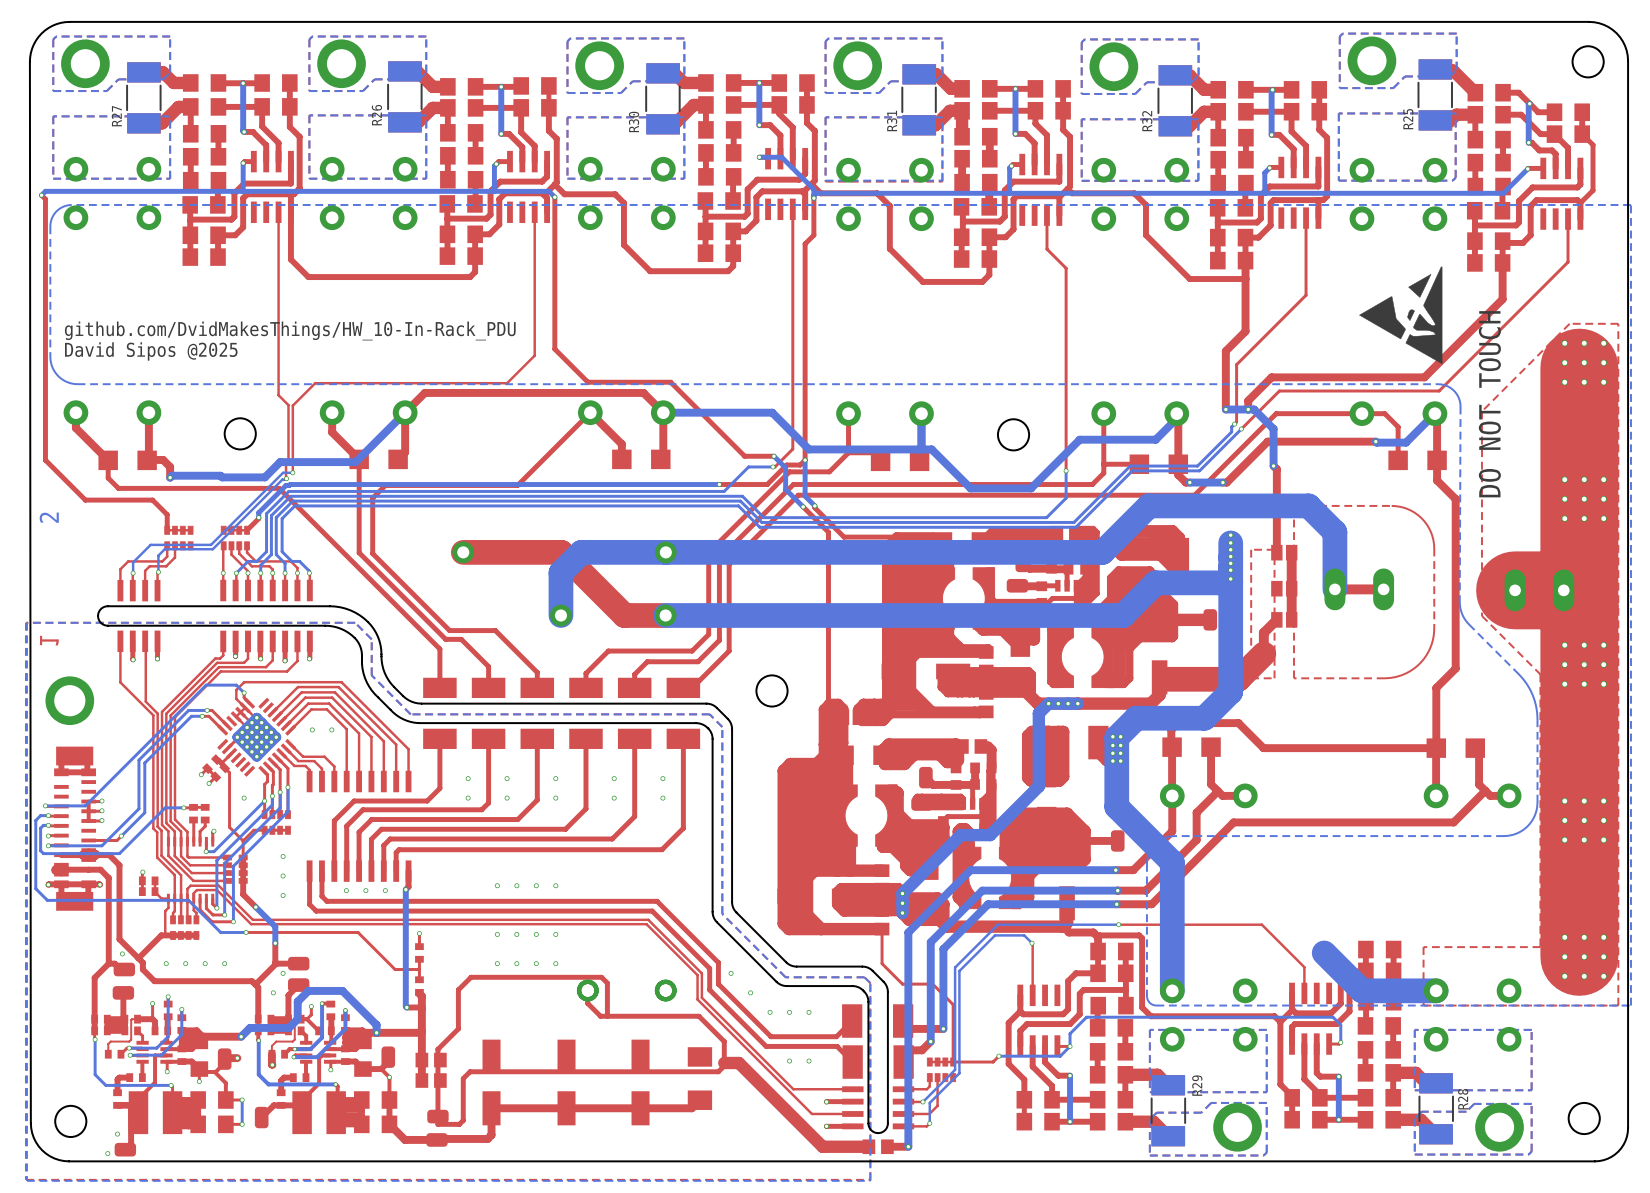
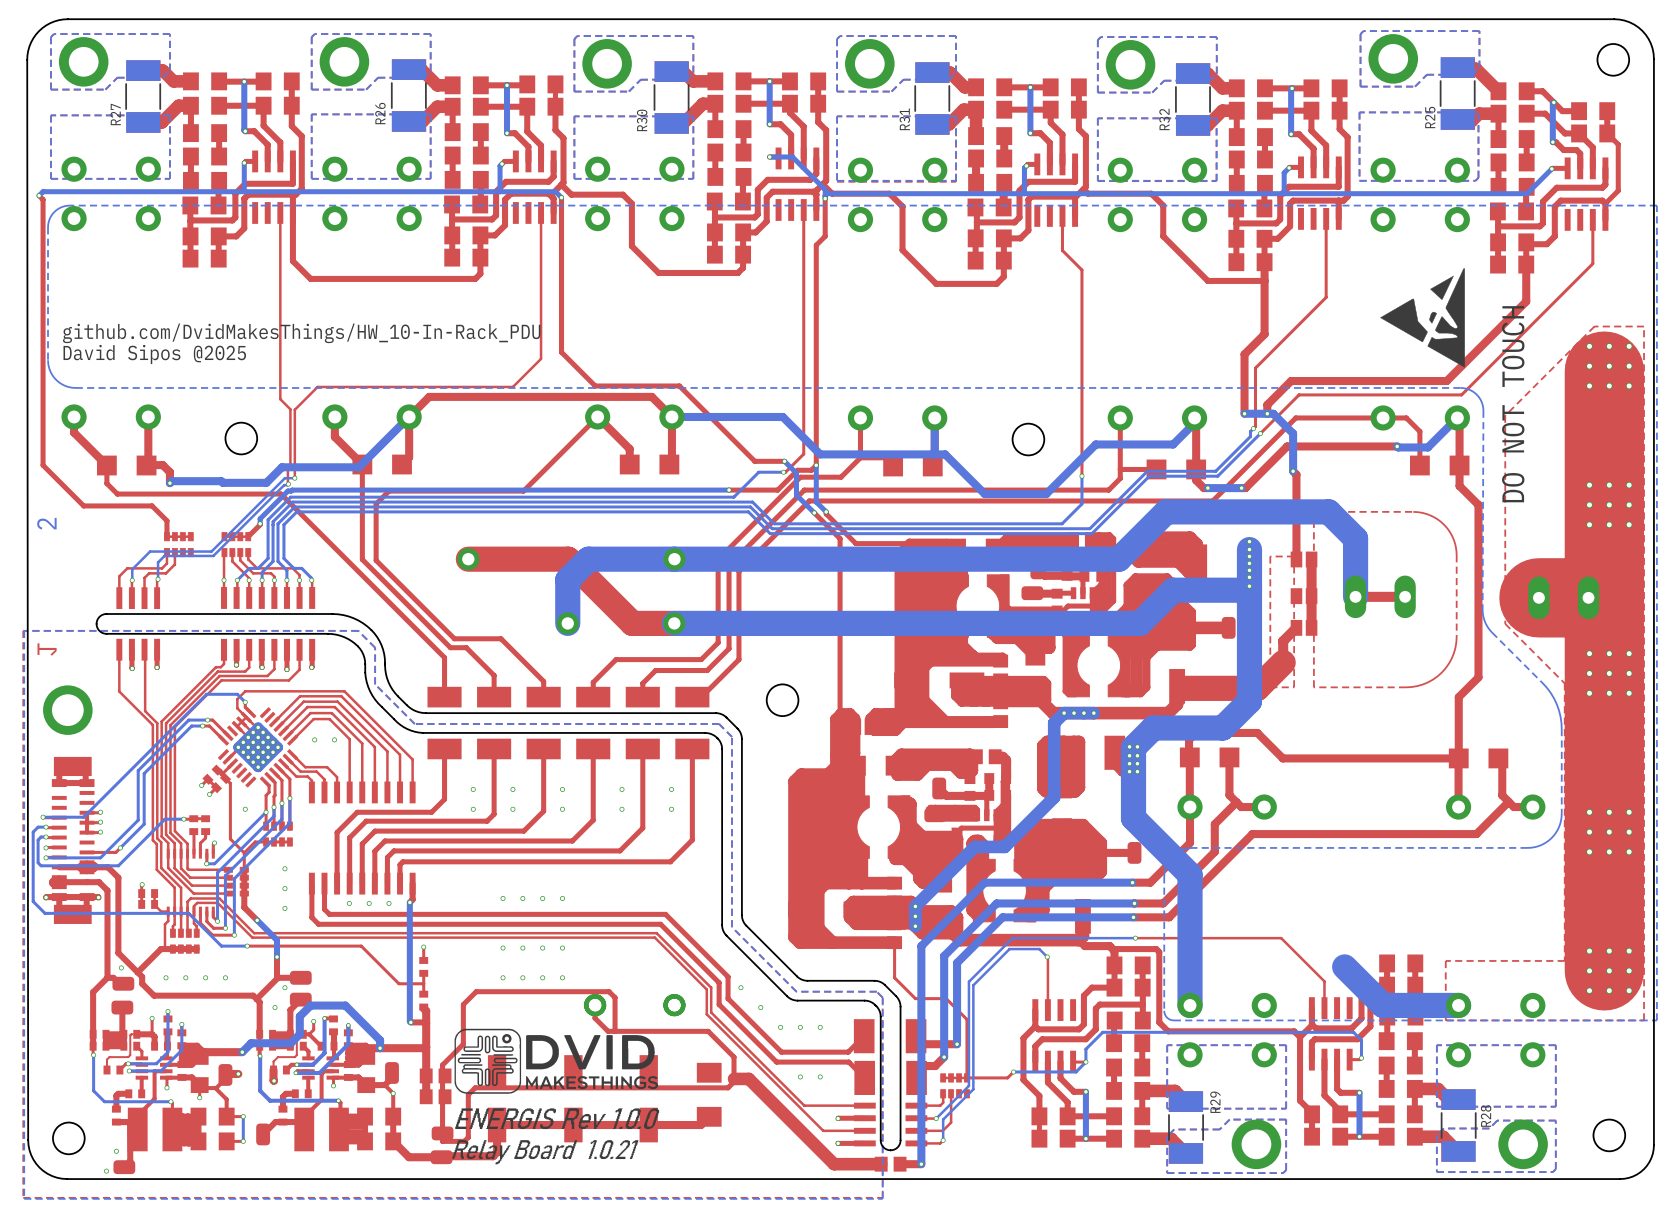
drawing: none -> [454, 1028, 659, 1094]
drawing: none -> [452, 1108, 660, 1165]

